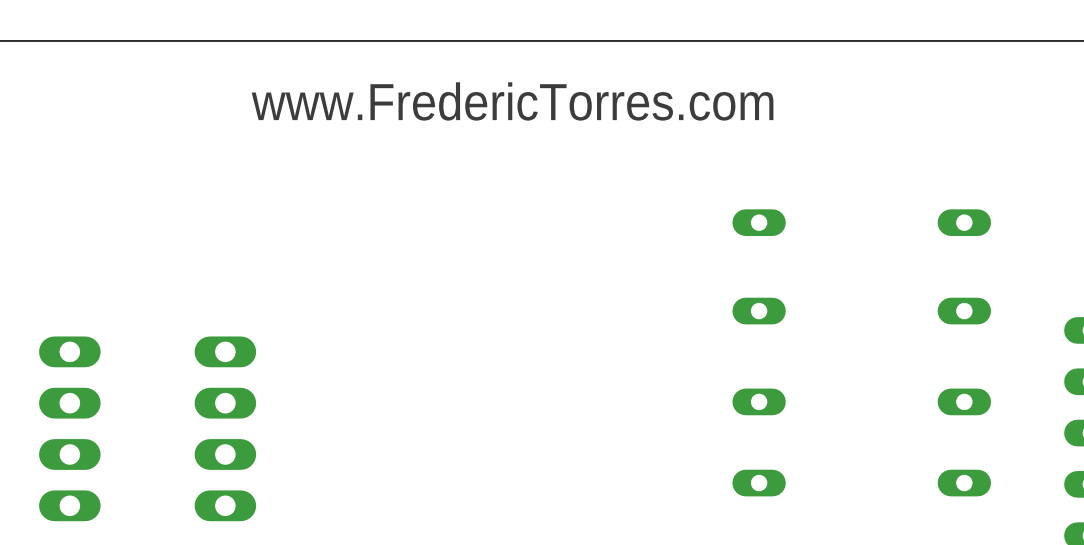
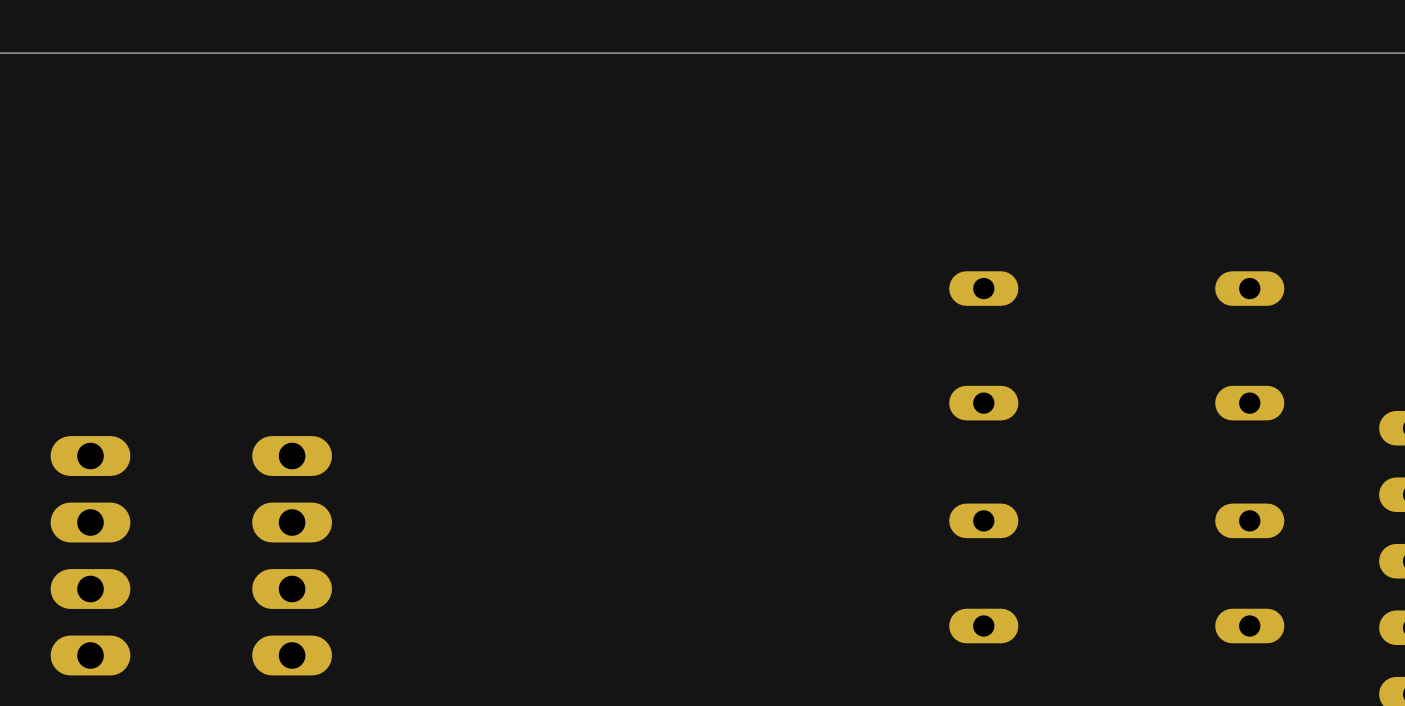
text: www.FredericTorres.com (512, 101) -> none

